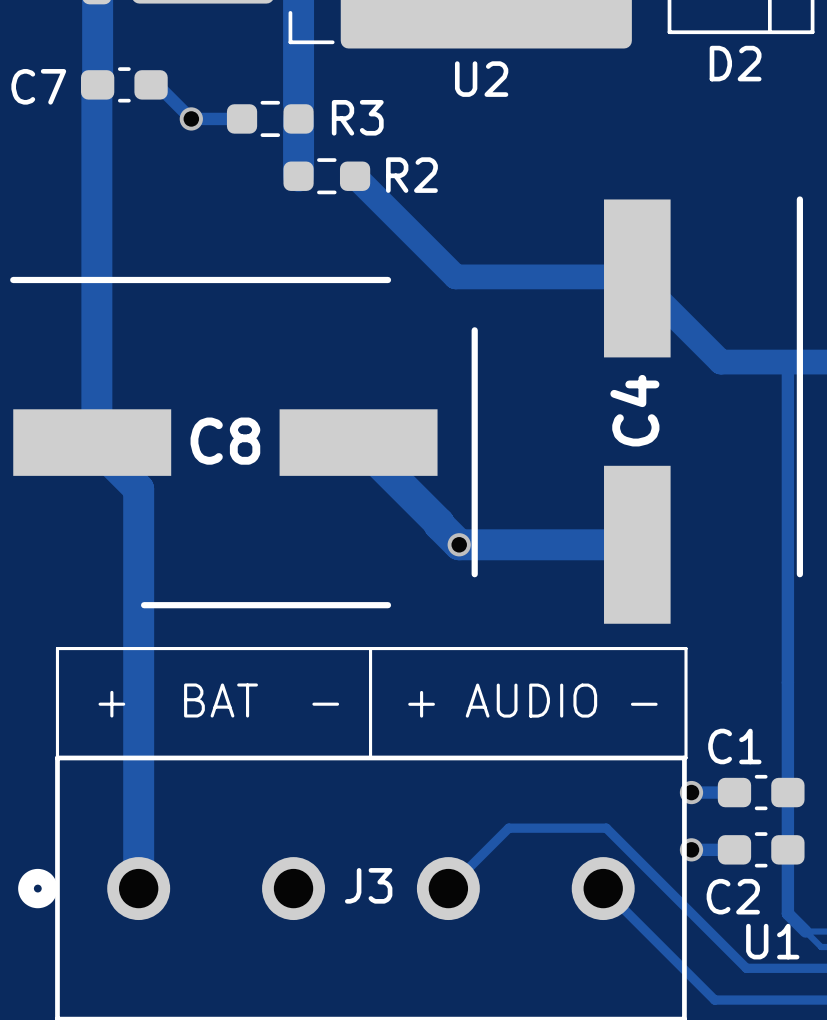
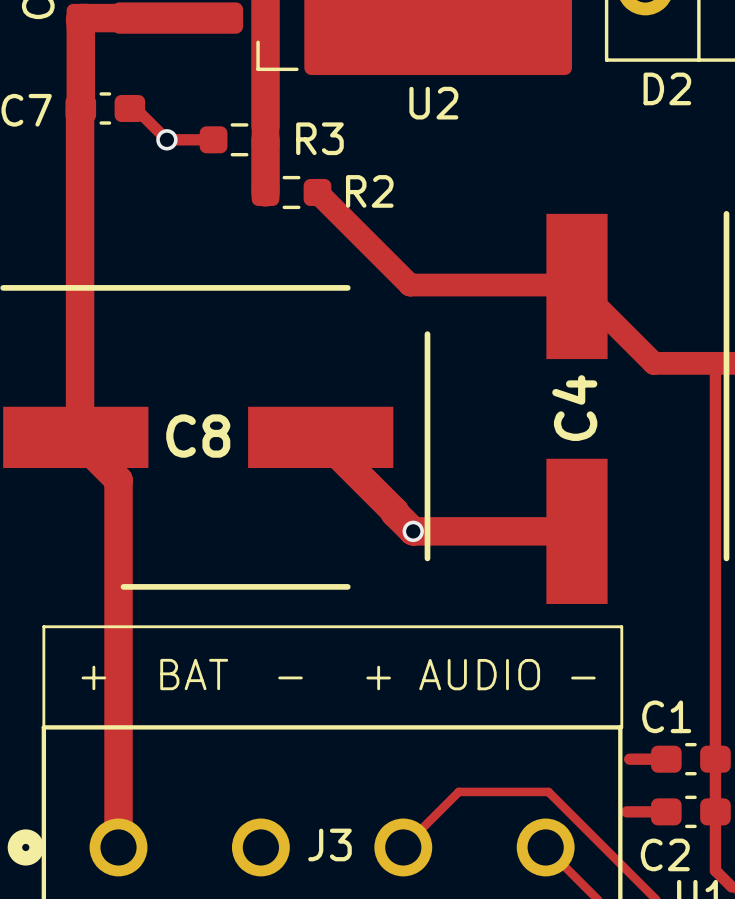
line: (370, 648) (370, 757) -> none
via: (691, 792) -> none
via: (691, 849) -> none

